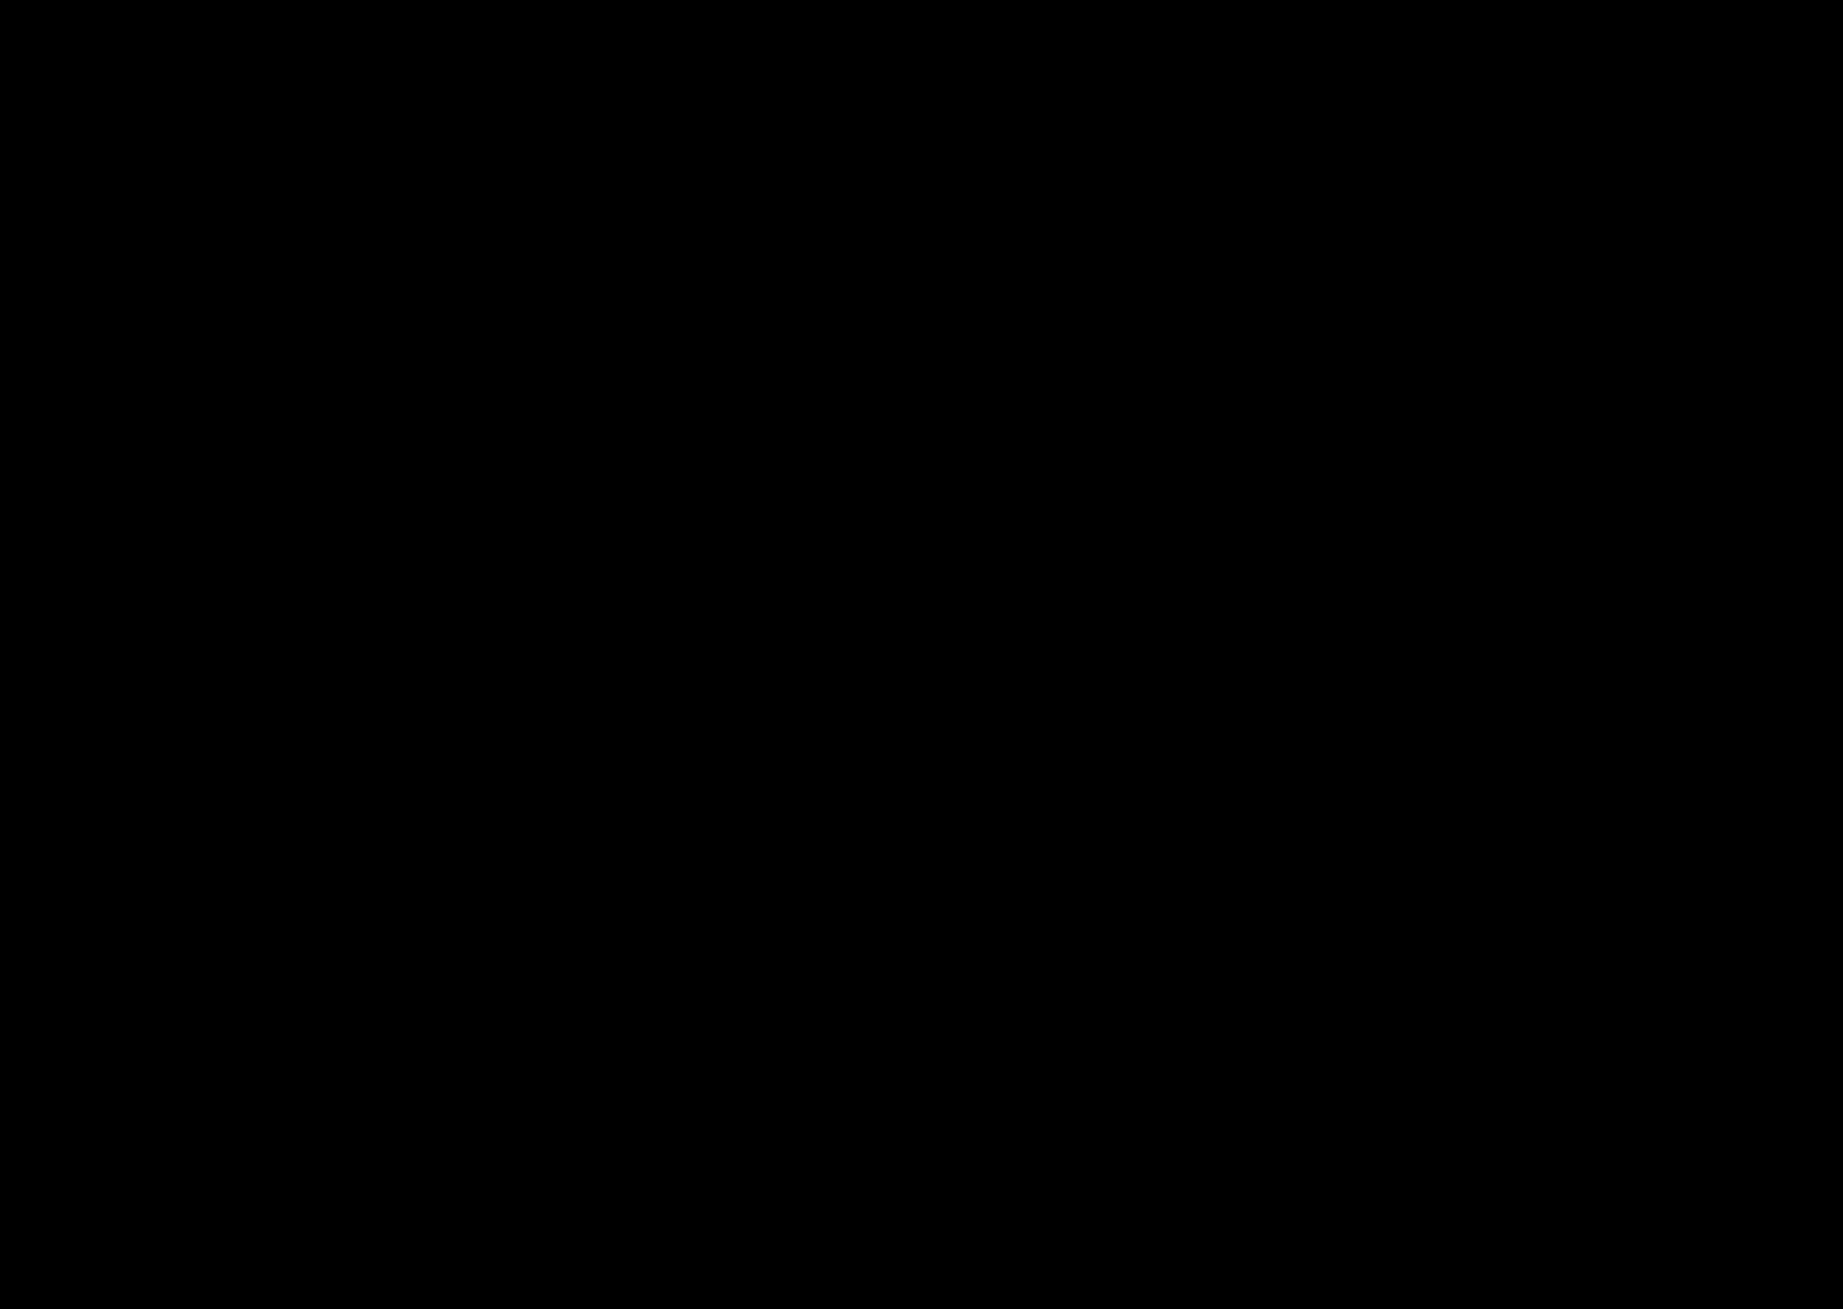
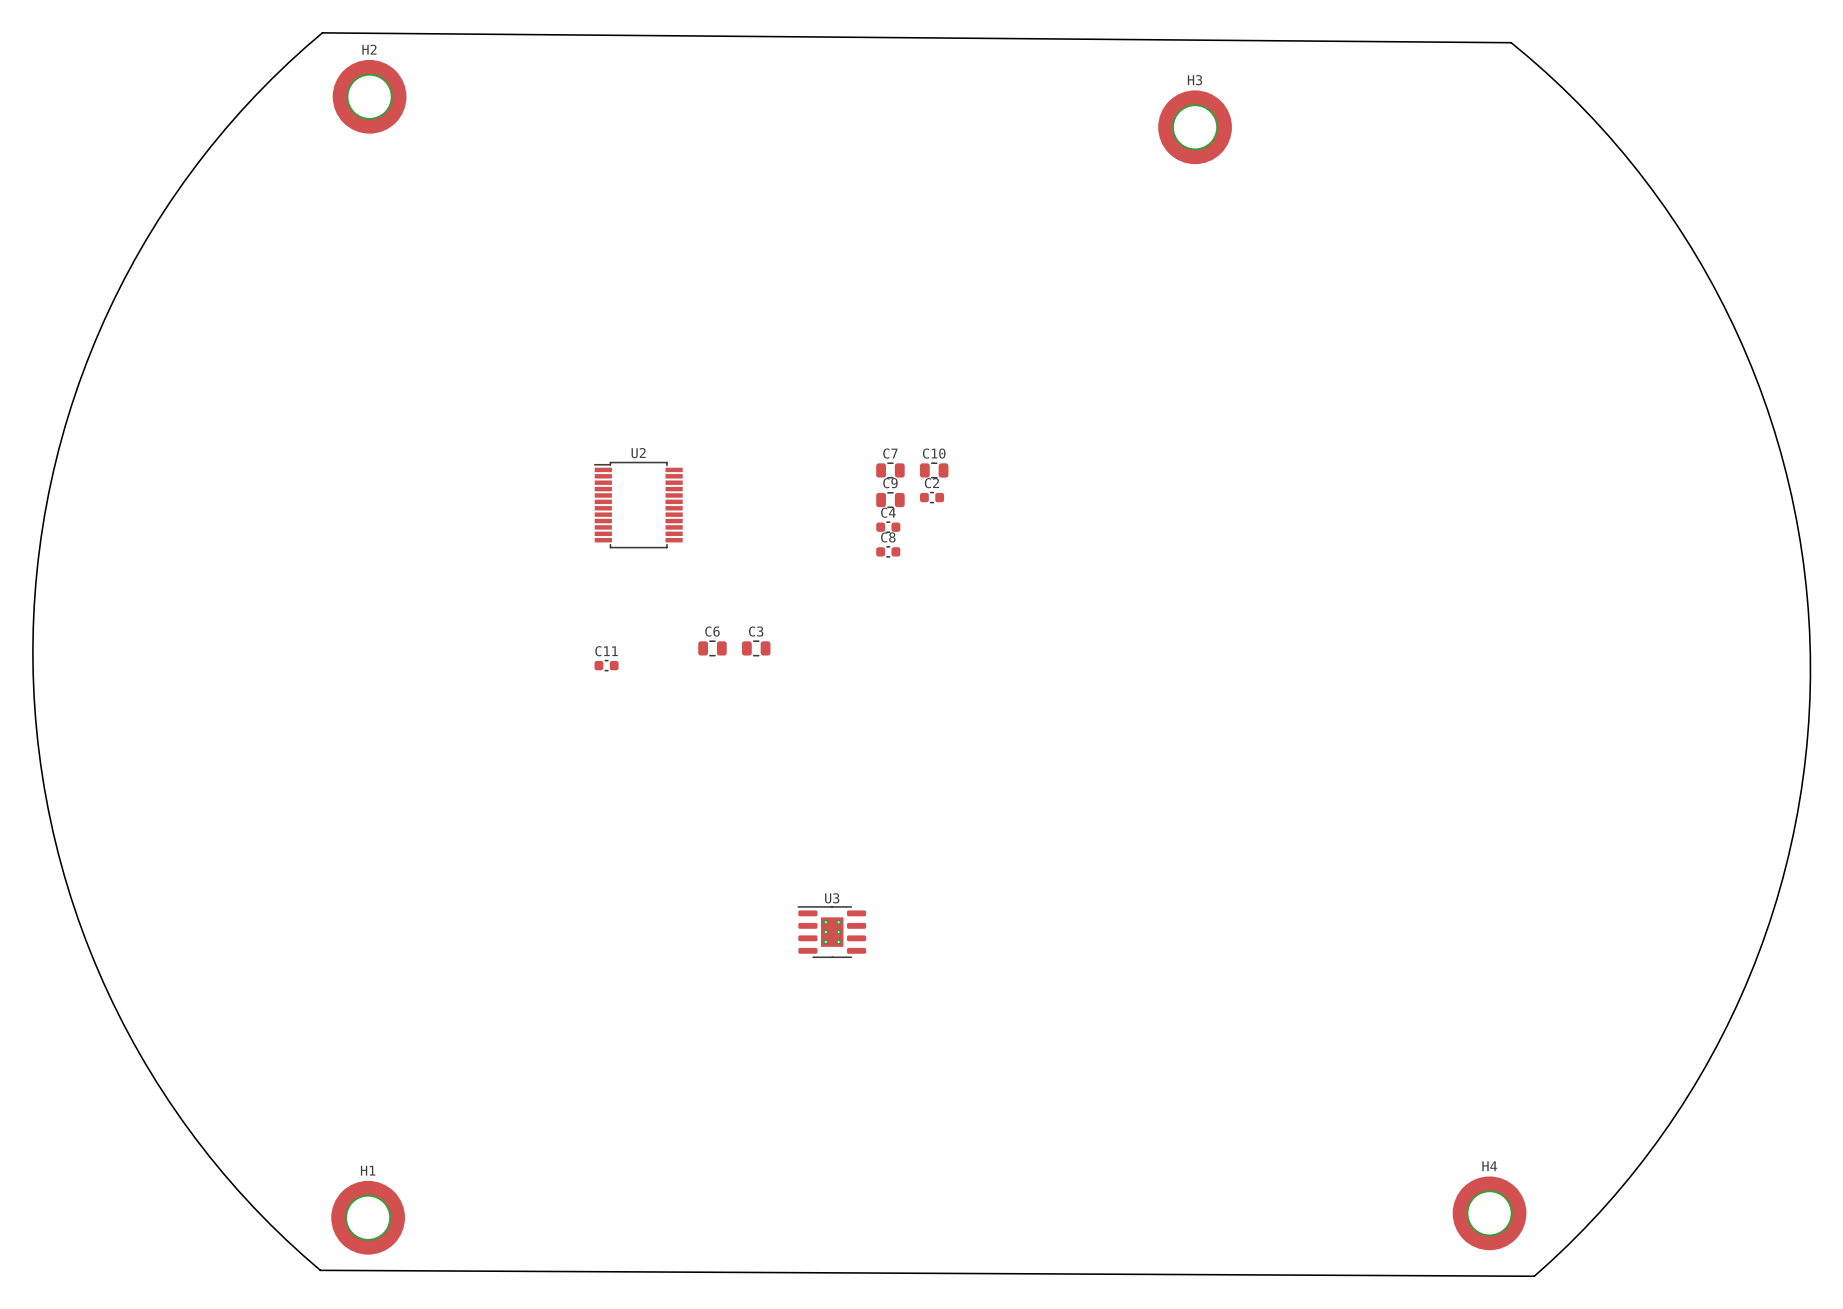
board edge: none -> (322, 32) (1511, 42) (1545, 72) (1594, 119) (1652, 189) (1690, 245) (1733, 325) (1759, 388) (1786, 474) (1803, 563) (1809, 631) (1808, 722) (1801, 789) (1788, 856) (1762, 943) (1726, 1026) (1694, 1086) (1642, 1160) (1599, 1212) (1534, 1276) (320, 1270) (286, 1240) (238, 1191) (182, 1120) (133, 1043) (94, 961) (70, 897) (48, 809) (35, 719) (33, 628) (38, 560) (53, 470) (78, 383) (113, 299) (158, 220) (211, 146) (271, 78) (322, 32)
H2: none -> (369, 96)
H3: none -> (1195, 127)
C7: none -> (890, 470)
C10: none -> (934, 470)
C2: none -> (932, 497)
C9: none -> (890, 500)
U2: none -> (638, 505)
C4: none -> (888, 527)
C8: none -> (888, 551)
C6: none -> (712, 648)
C3: none -> (756, 648)
C11: none -> (606, 665)
U3: none -> (831, 932)
H4: none -> (1489, 1213)
H1: none -> (368, 1217)

